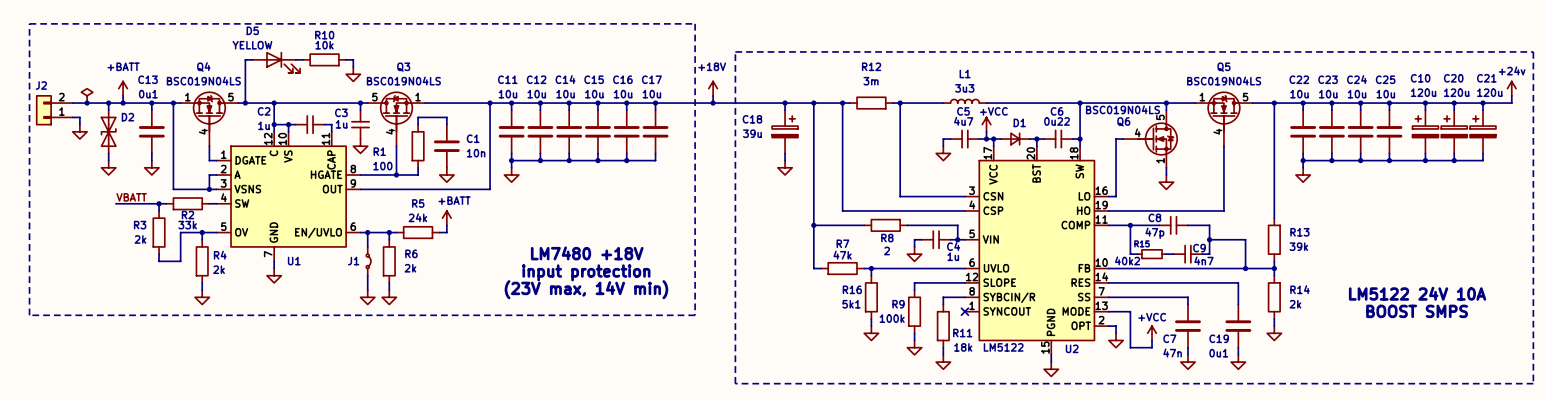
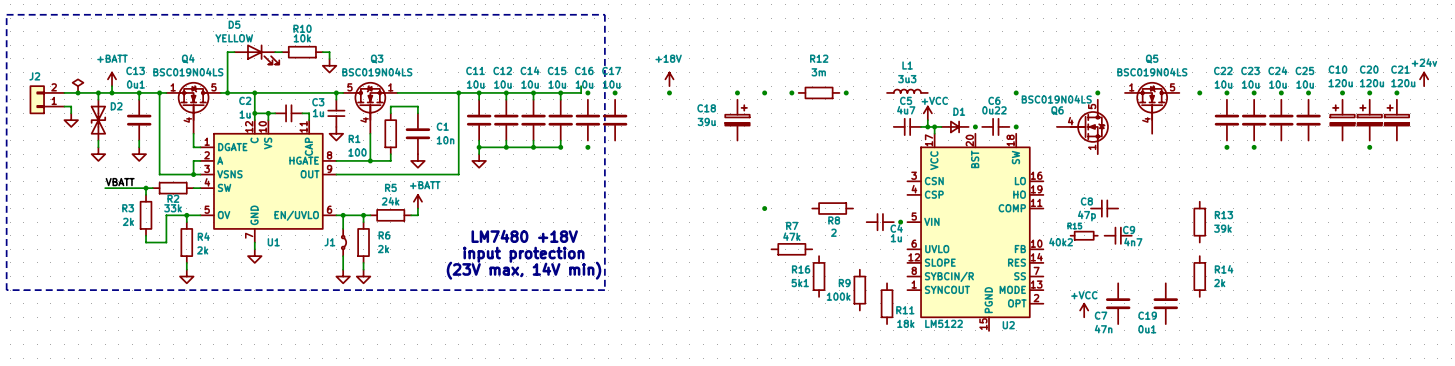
line: (29, 23) (695, 23) (695, 315) (29, 315) (29, 23) -> (6, 14) (6, 290) (604, 290) (604, 14) (6, 14)
line: (735, 51) (1533, 51) (1533, 383) (735, 383) (735, 51) -> none
wire: (713, 95) (713, 103) -> none
wire: (1511, 95) (1511, 103) (1252, 103) -> none
wire: (619, 103) (849, 103) -> (581, 92) (581, 86)
wire: (626, 103) (626, 110) -> none
wire: (655, 103) (655, 110) -> none
wire: (785, 103) (785, 110) -> none
wire: (813, 103) (813, 268) (821, 268) -> none
wire: (842, 103) (842, 210) (964, 210) -> none
wire: (892, 103) (943, 103) -> none
wire: (900, 103) (900, 196) (964, 196) -> none
wire: (986, 103) (1195, 103) -> none
wire: (1080, 103) (1080, 146) -> none
wire: (1166, 103) (1166, 110) -> none
wire: (1274, 103) (1274, 218) -> none
wire: (1303, 103) (1303, 110) -> none
wire: (1331, 103) (1331, 110) -> none
wire: (1360, 103) (1360, 110) -> none
wire: (1389, 103) (1389, 110) -> none
wire: (1425, 103) (1425, 110) -> none
wire: (1454, 103) (1454, 110) -> none
wire: (1483, 103) (1483, 110) -> none
wire: (950, 139) (943, 139) (943, 146) -> none
wire: (1029, 139) (1044, 139) -> none
wire: (1036, 139) (1036, 146) -> none
wire: (1072, 139) (1080, 139) -> none
wire: (1123, 139) (1116, 139) (1116, 196) (1108, 196) -> none
wire: (1223, 146) (1223, 210) (1108, 210) -> none
wire: (626, 153) (626, 160) -> none
wire: (655, 153) (655, 160) (597, 160) -> none
wire: (785, 153) (785, 160) -> none
power symbol: (943, 153) -> none
wire: (1303, 153) (1303, 167) -> none
wire: (1331, 153) (1331, 160) -> none
wire: (1360, 153) (1360, 160) -> none
wire: (1389, 153) (1389, 160) -> none
wire: (1425, 153) (1425, 160) -> none
wire: (1454, 153) (1454, 160) -> none
wire: (1483, 153) (1483, 160) (1303, 160) -> none
junction: (1360, 160) -> none
junction: (1389, 160) -> none
junction: (1425, 160) -> none
power symbol: (785, 167) -> none
wire: (1166, 167) (1166, 174) -> none
power symbol: (1303, 174) -> none
power symbol: (1166, 182) -> none
wire: (813, 225) (864, 225) -> none
wire: (907, 225) (957, 225) (957, 239) -> none
wire: (1108, 225) (1159, 225) -> none
wire: (1130, 225) (1130, 254) (1137, 254) -> none
junction: (1130, 225) -> none
wire: (1187, 225) (1209, 225) (1209, 254) (1202, 254) -> none
wire: (921, 239) (914, 239) (914, 246) -> none
wire: (950, 239) (964, 239) -> none
wire: (1209, 239) (1245, 239) (1245, 268) -> none
junction: (1209, 239) -> none
text position: LM7480 +18V (587, 253) -> LM7480 +18V (524, 236)
power symbol: (914, 254) -> none
wire: (1166, 254) (1173, 254) -> none
wire: (1274, 261) (1274, 275) -> none
wire: (864, 268) (964, 268) -> none
wire: (871, 268) (871, 275) -> none
junction: (871, 268) -> none
wire: (1108, 268) (1274, 268) -> none
junction: (1245, 268) -> none
junction: (1274, 268) -> none
text position: input protection (586, 272) -> input protection (523, 254)
wire: (964, 282) (914, 282) (914, 290) -> none
wire: (1108, 282) (1238, 282) (1238, 304) -> none
text position: (23V max, 14V min) (586, 289) -> (23V max, 14V min) (524, 270)
text: LM5122 24V 10A (1417, 293) -> none
wire: (964, 297) (943, 297) (943, 304) -> none
wire: (1108, 297) (1187, 297) (1187, 304) -> none
no-connect mark: (964, 311) -> none
wire: (1108, 311) (1130, 311) (1130, 347) (1152, 347) (1152, 340) -> none
text: BOOST SMPS (1417, 311) -> none
wire: (871, 318) (871, 326) -> none
wire: (1274, 318) (1274, 326) -> none
wire: (1108, 326) (1116, 326) (1116, 333) -> none
power symbol: (871, 333) -> none
wire: (914, 333) (914, 340) -> none
power symbol: (1274, 333) -> none
power symbol: (1116, 340) -> none
power symbol: (914, 347) -> none
wire: (943, 347) (943, 354) -> none
wire: (1187, 347) (1187, 354) -> none
wire: (1238, 347) (1238, 354) -> none
wire: (1051, 354) (1051, 362) -> none
power symbol: (943, 362) -> none
power symbol: (1187, 362) -> none
power symbol: (1238, 362) -> none
power symbol: (1051, 369) -> none

